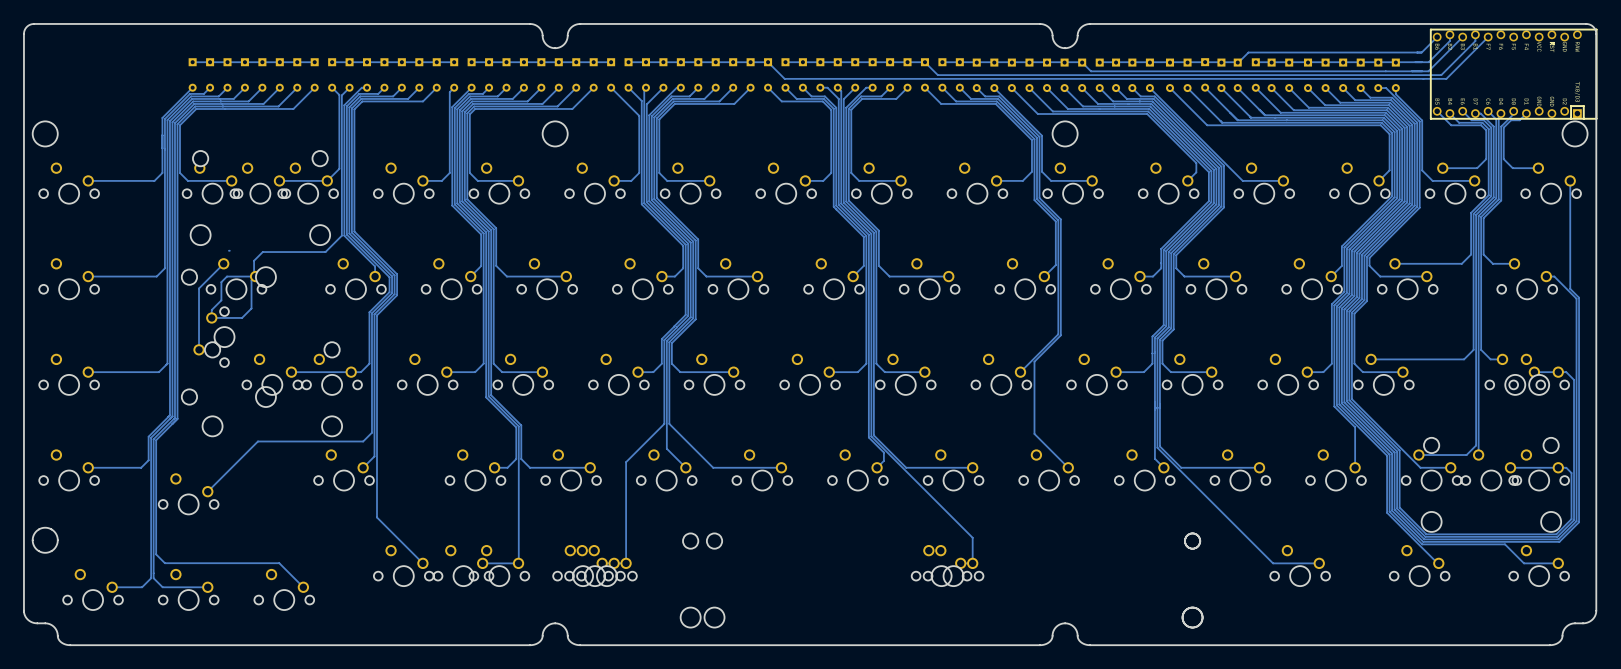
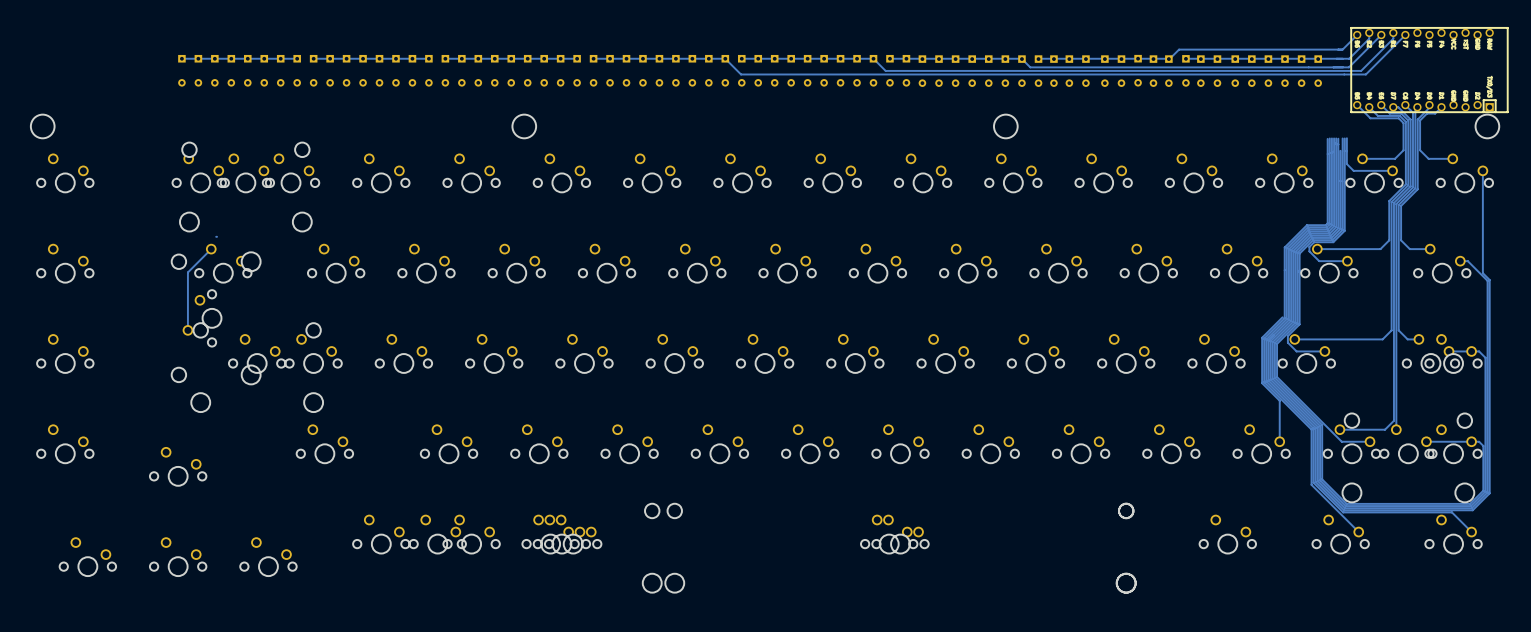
track: (192, 87) (162, 117) (162, 172) (154, 180) (88, 180) -> none
track: (210, 87) (203, 93) (190, 93) (164, 119) (164, 268) (156, 276) (88, 276) -> none
track: (227, 87) (218, 96) (191, 96) (167, 120) (167, 363) (158, 372) (88, 372) -> none
track: (244, 87) (233, 98) (192, 98) (169, 121) (169, 415) (148, 436) (148, 460) (141, 467) (88, 467) -> none
track: (262, 87) (248, 101) (193, 101) (172, 122) (172, 416) (151, 437) (151, 578) (142, 587) (112, 587) -> none
track: (279, 87) (263, 103) (194, 103) (174, 123) (174, 417) (153, 439) (153, 578) (162, 587) (207, 587) -> none
track: (297, 87) (278, 106) (195, 106) (177, 124) (177, 418) (156, 440) (156, 554) (164, 563) (279, 563) (303, 587) -> none
track: (314, 87) (293, 108) (196, 108) (180, 125) (180, 172) (187, 180) (231, 180) -> none
track: (332, 87) (339, 94) (339, 168) (327, 180) (279, 180) -> none
track: (349, 87) (341, 95) (341, 235) (325, 252) (262, 252) (254, 260) (254, 278) (251, 280) (251, 308) (242, 317) (211, 317) (211, 309) (221, 300) (221, 282) (227, 276) (254, 276) -> none
track: (367, 87) (361, 87) (344, 105) (344, 235) (375, 266) (375, 276) -> none
track: (384, 87) (378, 93) (359, 93) (346, 106) (346, 234) (389, 277) (389, 292) (369, 312) (369, 363) (361, 372) (291, 372) -> none
track: (401, 87) (393, 96) (360, 96) (349, 107) (349, 233) (392, 276) (392, 293) (371, 313) (371, 432) (363, 441) (257, 441) (207, 491) -> none
track: (419, 87) (408, 98) (361, 98) (351, 108) (351, 232) (394, 275) (394, 294) (374, 314) (374, 456) (363, 467) -> none
track: (436, 87) (423, 101) (362, 101) (354, 109) (354, 231) (397, 274) (397, 295) (376, 315) (376, 517) (422, 563) -> none
track: (454, 87) (449, 92) (449, 172) (441, 180) (422, 180) -> none
track: (471, 87) (452, 107) (452, 205) (481, 234) (481, 266) (470, 276) -> none
track: (489, 87) (482, 93) (468, 93) (454, 108) (454, 204) (483, 233) (483, 363) (475, 372) (446, 372) -> none
track: (506, 87) (497, 96) (470, 96) (457, 109) (457, 203) (486, 232) (486, 397) (516, 427) (516, 459) (507, 467) (494, 467) -> none
track: (523, 87) (512, 98) (471, 98) (459, 110) (459, 202) (488, 231) (488, 396) (518, 426) (518, 563) (482, 563) -> none
track: (541, 87) (527, 101) (472, 101) (462, 111) (462, 201) (491, 230) (491, 395) (521, 425) (521, 459) (530, 467) (590, 467) -> none
track: (558, 87) (542, 103) (473, 103) (464, 112) (464, 200) (493, 229) (493, 363) (502, 372) (542, 372) -> none
track: (576, 87) (557, 106) (474, 106) (467, 113) (467, 199) (496, 228) (496, 265) (506, 276) (566, 276) -> none
track: (593, 87) (572, 108) (475, 108) (469, 114) (469, 172) (477, 180) (518, 180) -> none
track: (611, 87) (639, 115) (639, 172) (631, 180) (614, 180) -> none
track: (628, 87) (641, 100) (641, 204) (683, 245) (683, 268) (674, 276) (661, 276) -> none
track: (645, 87) (644, 89) (644, 203) (685, 244) (685, 314) (661, 339) (661, 363) (653, 372) (638, 372) -> none
track: (663, 87) (646, 104) (646, 202) (688, 243) (688, 316) (664, 340) (664, 423) (626, 462) (626, 563) (602, 563) -> none
track: (680, 87) (676, 87) (649, 115) (649, 201) (690, 242) (690, 317) (666, 341) (666, 448) (685, 467) -> none
track: (698, 87) (689, 96) (671, 96) (651, 116) (651, 200) (693, 241) (693, 318) (669, 342) (669, 423) (713, 467) (781, 467) -> none
track: (715, 87) (704, 98) (672, 98) (654, 117) (654, 199) (695, 240) (695, 319) (671, 343) (671, 363) (680, 372) (733, 372) -> none
track: (733, 87) (719, 101) (673, 101) (656, 118) (656, 198) (698, 239) (698, 268) (706, 276) (757, 276) -> none
track: (750, 87) (734, 103) (674, 103) (659, 119) (659, 172) (667, 180) (709, 180) -> none
track: (768, 87) (781, 101) (822, 101) (831, 109) (831, 172) (823, 180) (805, 180) -> none
track: (785, 87) (796, 98) (823, 98) (833, 108) (833, 206) (863, 236) (863, 265) (853, 276) -> none
track: (802, 87) (811, 96) (824, 96) (836, 107) (836, 205) (866, 235) (866, 363) (857, 372) (829, 372) -> none
track: (820, 87) (827, 87) (838, 98) (838, 204) (868, 234) (868, 437) (883, 452) (883, 460) (877, 467) -> none
track: (837, 87) (841, 91) (841, 203) (871, 233) (871, 436) (972, 537) (972, 563) (960, 563) -> none
track: (855, 87) (843, 99) (843, 202) (873, 232) (873, 435) (906, 467) (972, 467) -> none
track: (872, 87) (866, 87) (846, 107) (846, 201) (876, 231) (876, 363) (884, 372) (924, 372) -> none
track: (890, 87) (881, 96) (861, 96) (848, 108) (848, 200) (878, 230) (878, 265) (889, 276) (948, 276) -> none
track: (907, 87) (896, 98) (862, 98) (851, 109) (851, 172) (859, 180) (900, 180) -> none
track: (924, 87) (941, 103) (995, 103) (1031, 140) (1031, 171) (1022, 180) (996, 180) -> none
track: (942, 87) (956, 101) (996, 101) (1034, 139) (1034, 200) (1055, 221) (1055, 265) (1044, 276) -> none
track: (959, 87) (971, 98) (998, 98) (1036, 137) (1036, 199) (1058, 220) (1058, 334) (1020, 372) -> none
track: (1205, 87) (1237, 120) (1382, 120) (1394, 132) (1394, 197) (1344, 247) (1344, 291) (1331, 304) (1331, 363) (1323, 372) (1307, 372) -> none
track: (1255, 87) (1280, 112) (1385, 112) (1402, 128) (1402, 200) (1351, 250) (1351, 294) (1339, 307) (1339, 404) (1389, 454) (1389, 511) (1422, 544) (1505, 544) (1524, 563) (1558, 563) -> (1329, 138) (1329, 224) (1326, 227) (1307, 227) (1286, 248) (1286, 319) (1266, 339) (1266, 381) (1313, 428) (1313, 482) (1343, 512) (1452, 512) (1471, 532)
track: (976, 88) (985, 96) (999, 96) (1039, 136) (1039, 198) (1060, 219) (1060, 335) (1034, 361) (1034, 433) (1068, 467) -> none
track: (994, 88) (1042, 135) (1042, 171) (1051, 180) (1092, 180) -> none
track: (1011, 88) (1037, 114) (1147, 114) (1196, 163) (1196, 172) (1187, 180) -> none
track: (1029, 88) (1052, 111) (1148, 111) (1208, 172) (1208, 201) (1161, 248) (1161, 268) (1153, 276) (1140, 276) -> none
track: (1047, 88) (1067, 108) (1149, 108) (1211, 171) (1211, 202) (1163, 249) (1163, 325) (1152, 336) (1152, 363) (1143, 372) (1116, 372) -> none
track: (1064, 88) (1083, 106) (1150, 106) (1213, 170) (1213, 203) (1166, 250) (1166, 326) (1154, 337) (1154, 458) (1163, 467) -> none
track: (1082, 88) (1098, 103) (1151, 103) (1216, 168) (1216, 204) (1168, 252) (1168, 327) (1157, 338) (1157, 447) (1273, 563) (1319, 563) -> none
track: (1099, 88) (1113, 101) (1152, 101) (1218, 167) (1218, 205) (1171, 253) (1171, 328) (1159, 339) (1159, 446) (1181, 467) (1259, 467) -> none
track: (1116, 88) (1126, 98) (1153, 98) (1221, 166) (1221, 206) (1173, 254) (1173, 329) (1162, 340) (1162, 363) (1170, 372) (1211, 372) -> none
track: (1132, 88) (1140, 96) (1154, 96) (1223, 165) (1223, 207) (1176, 255) (1176, 268) (1184, 276) (1235, 276) -> none
track: (1149, 88) (1242, 180) (1283, 180) -> none
track: (1170, 88) (1207, 125) (1380, 125) (1389, 134) (1389, 170) (1379, 180) -> none
track: (1187, 88) (1222, 122) (1381, 122) (1392, 133) (1392, 196) (1341, 246) (1341, 265) (1331, 276) -> none
track: (1221, 88) (1251, 117) (1383, 117) (1397, 130) (1397, 198) (1346, 248) (1346, 292) (1334, 305) (1334, 406) (1355, 427) -> (1282, 317) (1262, 337) (1262, 383) (1279, 400) (1279, 403)
track: (1237, 88) (1264, 115) (1384, 115) (1399, 129) (1399, 199) (1349, 249) (1349, 293) (1336, 306) (1336, 405) (1387, 455) (1387, 512) (1438, 563) -> (1327, 138) (1327, 223) (1325, 225) (1306, 225) (1284, 247) (1284, 318) (1264, 338) (1264, 382) (1311, 429) (1311, 484) (1358, 532)
track: (1271, 88) (1293, 110) (1387, 110) (1404, 127) (1404, 201) (1354, 251) (1354, 295) (1341, 308) (1341, 403) (1392, 453) (1392, 510) (1423, 541) (1559, 541) (1579, 522) (1579, 297) (1570, 288) -> (1331, 138) (1331, 225) (1327, 229) (1308, 229) (1288, 249) (1288, 319) (1268, 340) (1268, 380) (1315, 427) (1315, 482) (1344, 510) (1472, 510) (1489, 493) (1489, 279) (1482, 272)
track: (1289, 88) (1308, 107) (1388, 107) (1407, 126) (1407, 202) (1356, 252) (1356, 296) (1344, 309) (1344, 402) (1394, 452) (1394, 509) (1424, 539) (1558, 539) (1576, 521) (1575, 297) -> (1334, 138) (1334, 226) (1328, 231) (1309, 231) (1291, 250) (1291, 320) (1270, 341) (1270, 379) (1317, 426) (1317, 481) (1344, 508) (1471, 508) (1487, 492) (1487, 280)
track: (1308, 88) (1325, 105) (1389, 105) (1409, 125) (1409, 203) (1359, 253) (1359, 298) (1346, 310) (1346, 401) (1397, 451) (1397, 508) (1425, 536) (1557, 536) (1574, 520) (1572, 378) -> (1336, 138) (1336, 227) (1329, 233) (1310, 233) (1293, 251) (1293, 321) (1272, 342) (1272, 378) (1320, 426) (1320, 480) (1345, 506) (1470, 506) (1485, 491) (1485, 357)
track: (1325, 88) (1340, 102) (1390, 102) (1412, 124) (1412, 204) (1361, 254) (1361, 299) (1349, 311) (1349, 400) (1399, 450) (1399, 507) (1426, 534) (1556, 534) (1571, 519) (1570, 472) -> (1338, 195) (1338, 228) (1330, 235) (1311, 235) (1295, 251) (1295, 322) (1274, 343) (1274, 377) (1322, 425) (1322, 479) (1346, 503) (1470, 503) (1483, 490) (1483, 445)
track: (1343, 88) (1355, 100) (1391, 100) (1414, 123) (1414, 205) (1364, 255) (1364, 300) (1351, 312) (1351, 399) (1420, 467) -> (1340, 150) (1340, 228) (1331, 237) (1312, 237) (1297, 252) (1297, 323) (1277, 343) (1277, 377) (1341, 441)
track: (1360, 88) (1370, 97) (1392, 97) (1417, 122) (1417, 146) -> none
track: (1378, 88) (1386, 88) (1419, 121) (1419, 207) (1369, 257) (1369, 265) (1380, 276) (1396, 276) -> (1344, 138) (1344, 230) (1333, 242) (1314, 242) (1309, 247) (1309, 251) (1319, 261)
track: (1395, 88) (1395, 94) (1422, 120) (1422, 170) (1433, 180) -> (1346, 138) (1346, 164) (1353, 170)
track: (1417, 206) (1366, 256) (1366, 301) (1354, 313) (1354, 363) (1362, 372) (1373, 372) -> (1342, 138) (1342, 229) (1332, 240) (1313, 240) (1299, 253) (1299, 324) (1287, 336) (1287, 342) (1296, 351)
board edge: (51, 529) (42, 528) (34, 534) (33, 543) (38, 551) (48, 552) (56, 546) (57, 537) (51, 529) -> none
board edge: (23, 610) (24, 612) (24, 613) (25, 616) (30, 621) (52, 625) (56, 629) (59, 641) (70, 645) (531, 645) (540, 641) (546, 627) (555, 623) (564, 627) (570, 641) (580, 645) (1041, 645) (1050, 641) (1056, 627) (1065, 623) (1073, 627) (1079, 641) (1088, 645) (1555, 644) (1561, 639) (1567, 626) (1572, 623) (1589, 621) (1594, 617) (1596, 612) (1595, 30) (1591, 25) (1586, 23) (1090, 23) (1081, 27) (1074, 43) (1065, 48) (1056, 44) (1050, 29) (1041, 24) (580, 23) (571, 27) (564, 43) (555, 48) (545, 43) (538, 27) (530, 23) (30, 24) (25, 28) (23, 34) (23, 611) -> none

